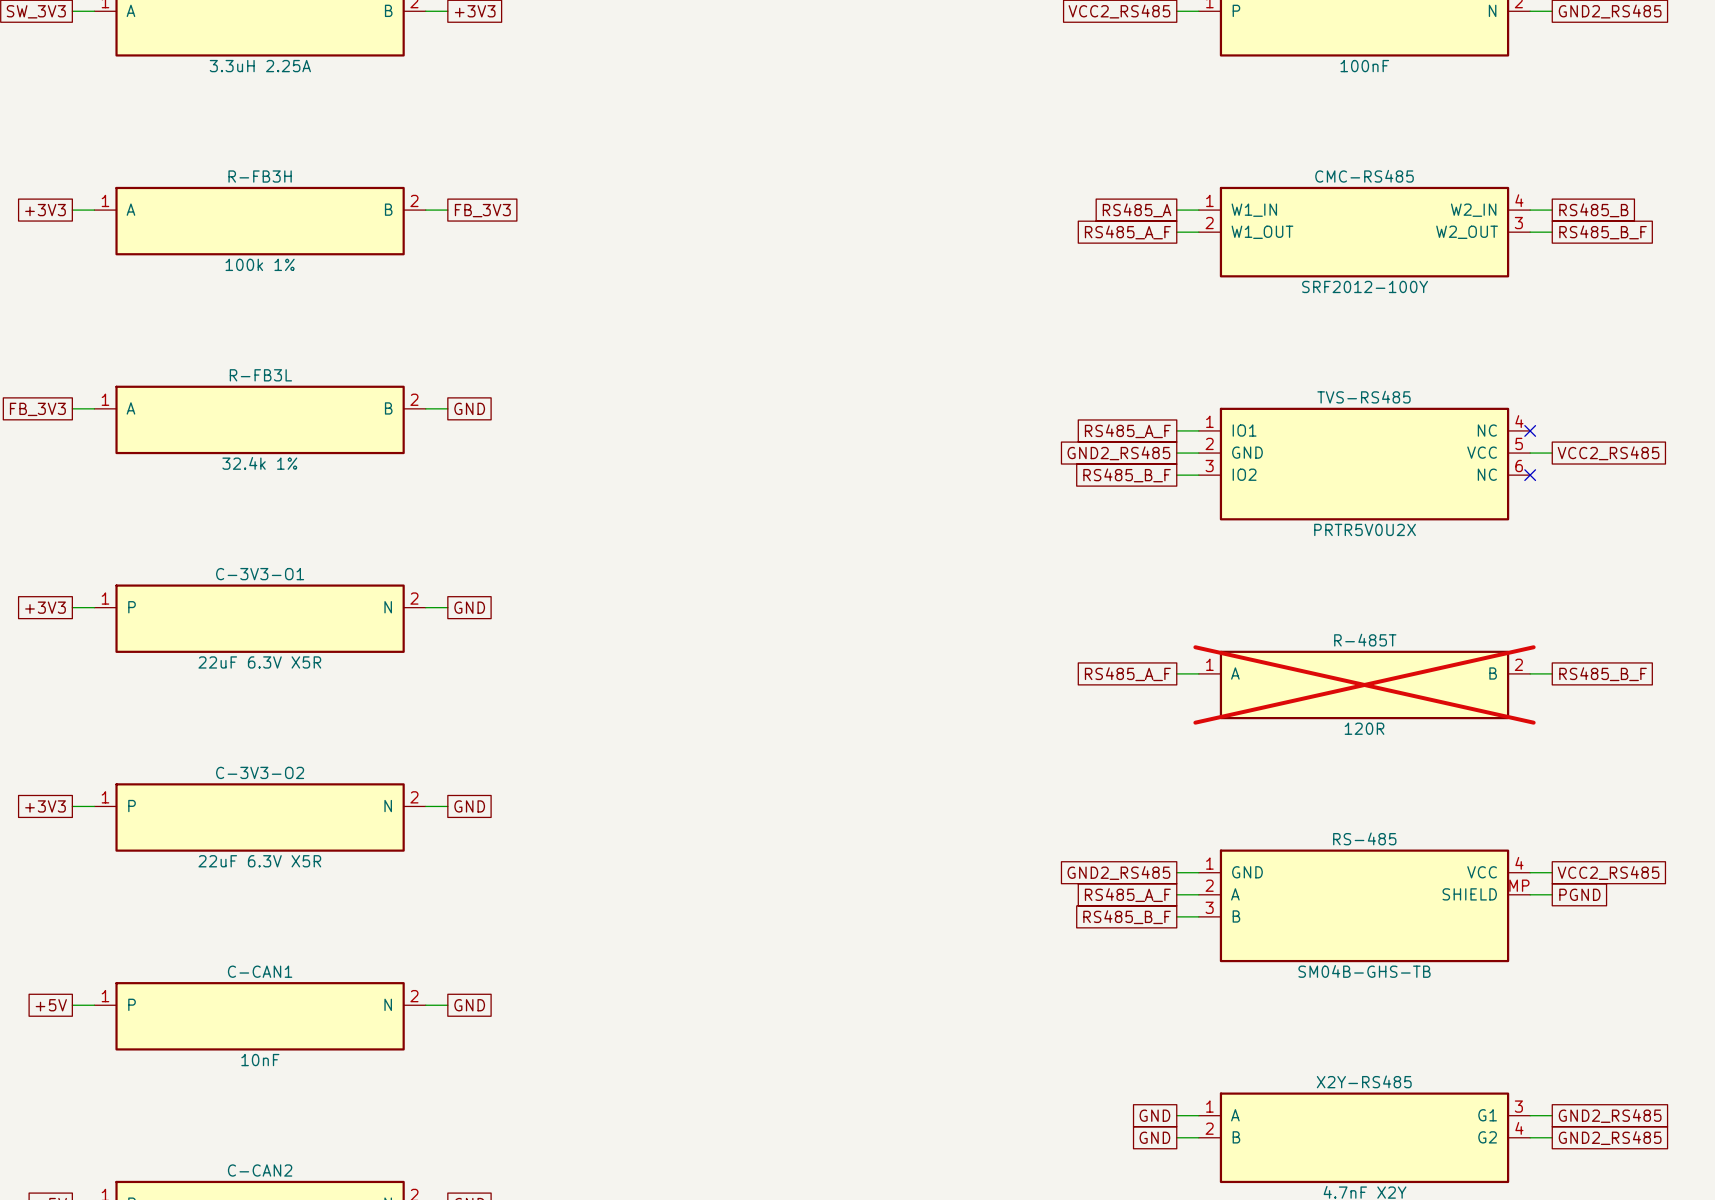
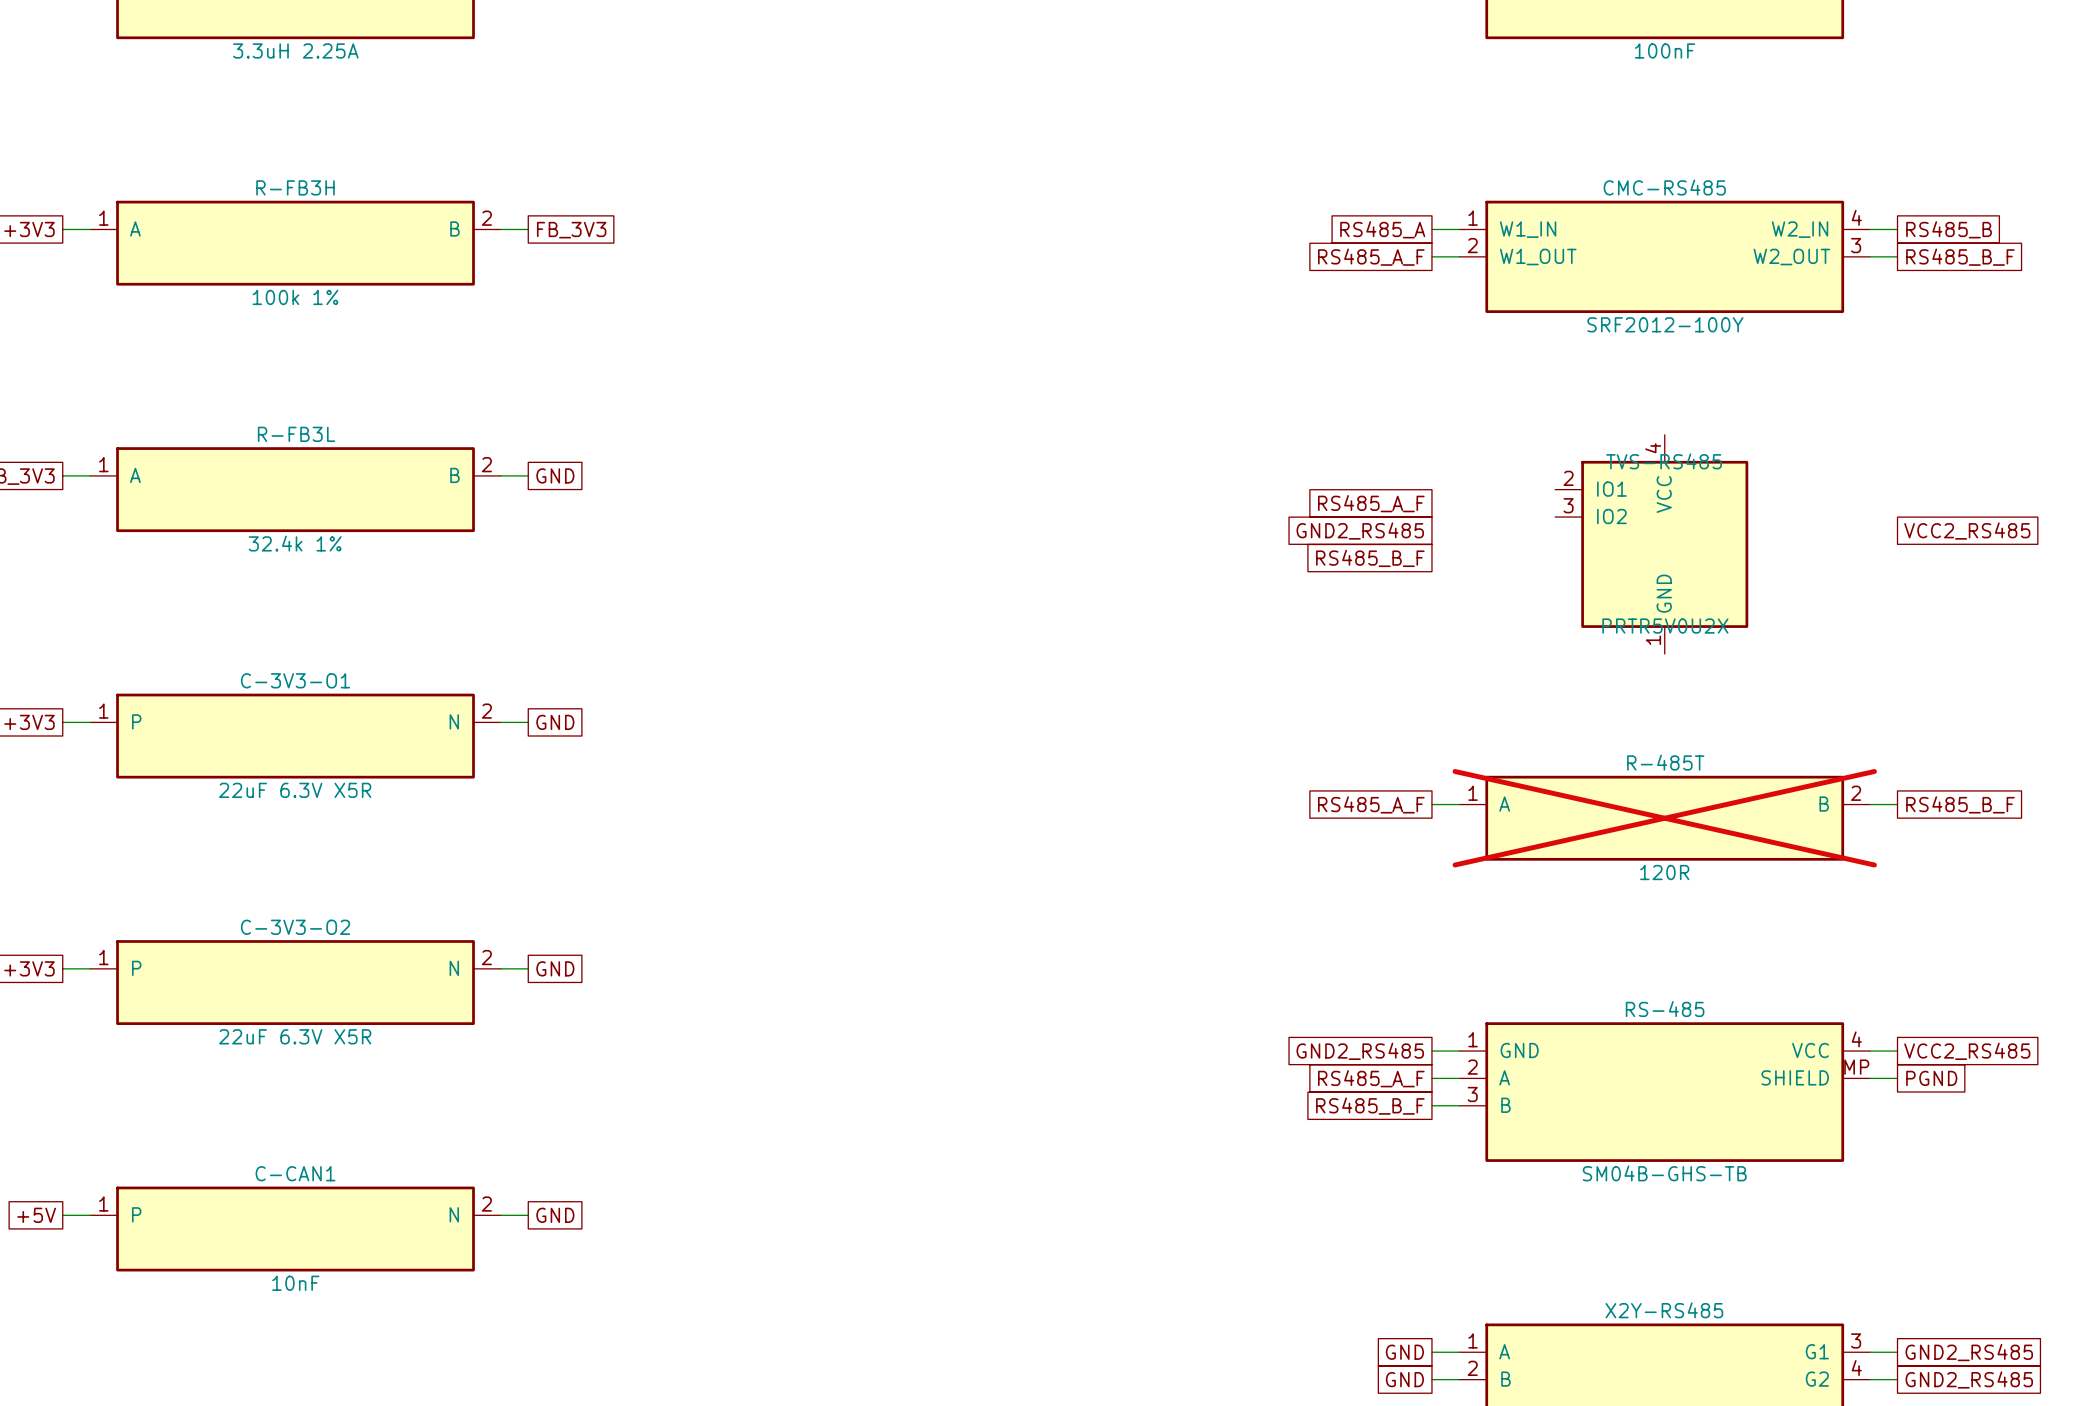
TVS-RS485 symbol: [1198, 407, 1531, 521] -> [1555, 434, 1749, 654]
wire: (1176, 430) (1198, 430) -> none
no-connect mark: (1530, 430) -> none
wire: (1176, 453) (1198, 453) -> none
wire: (1530, 453) (1552, 453) -> none
wire: (1176, 475) (1198, 475) -> none
no-connect mark: (1530, 475) -> none

